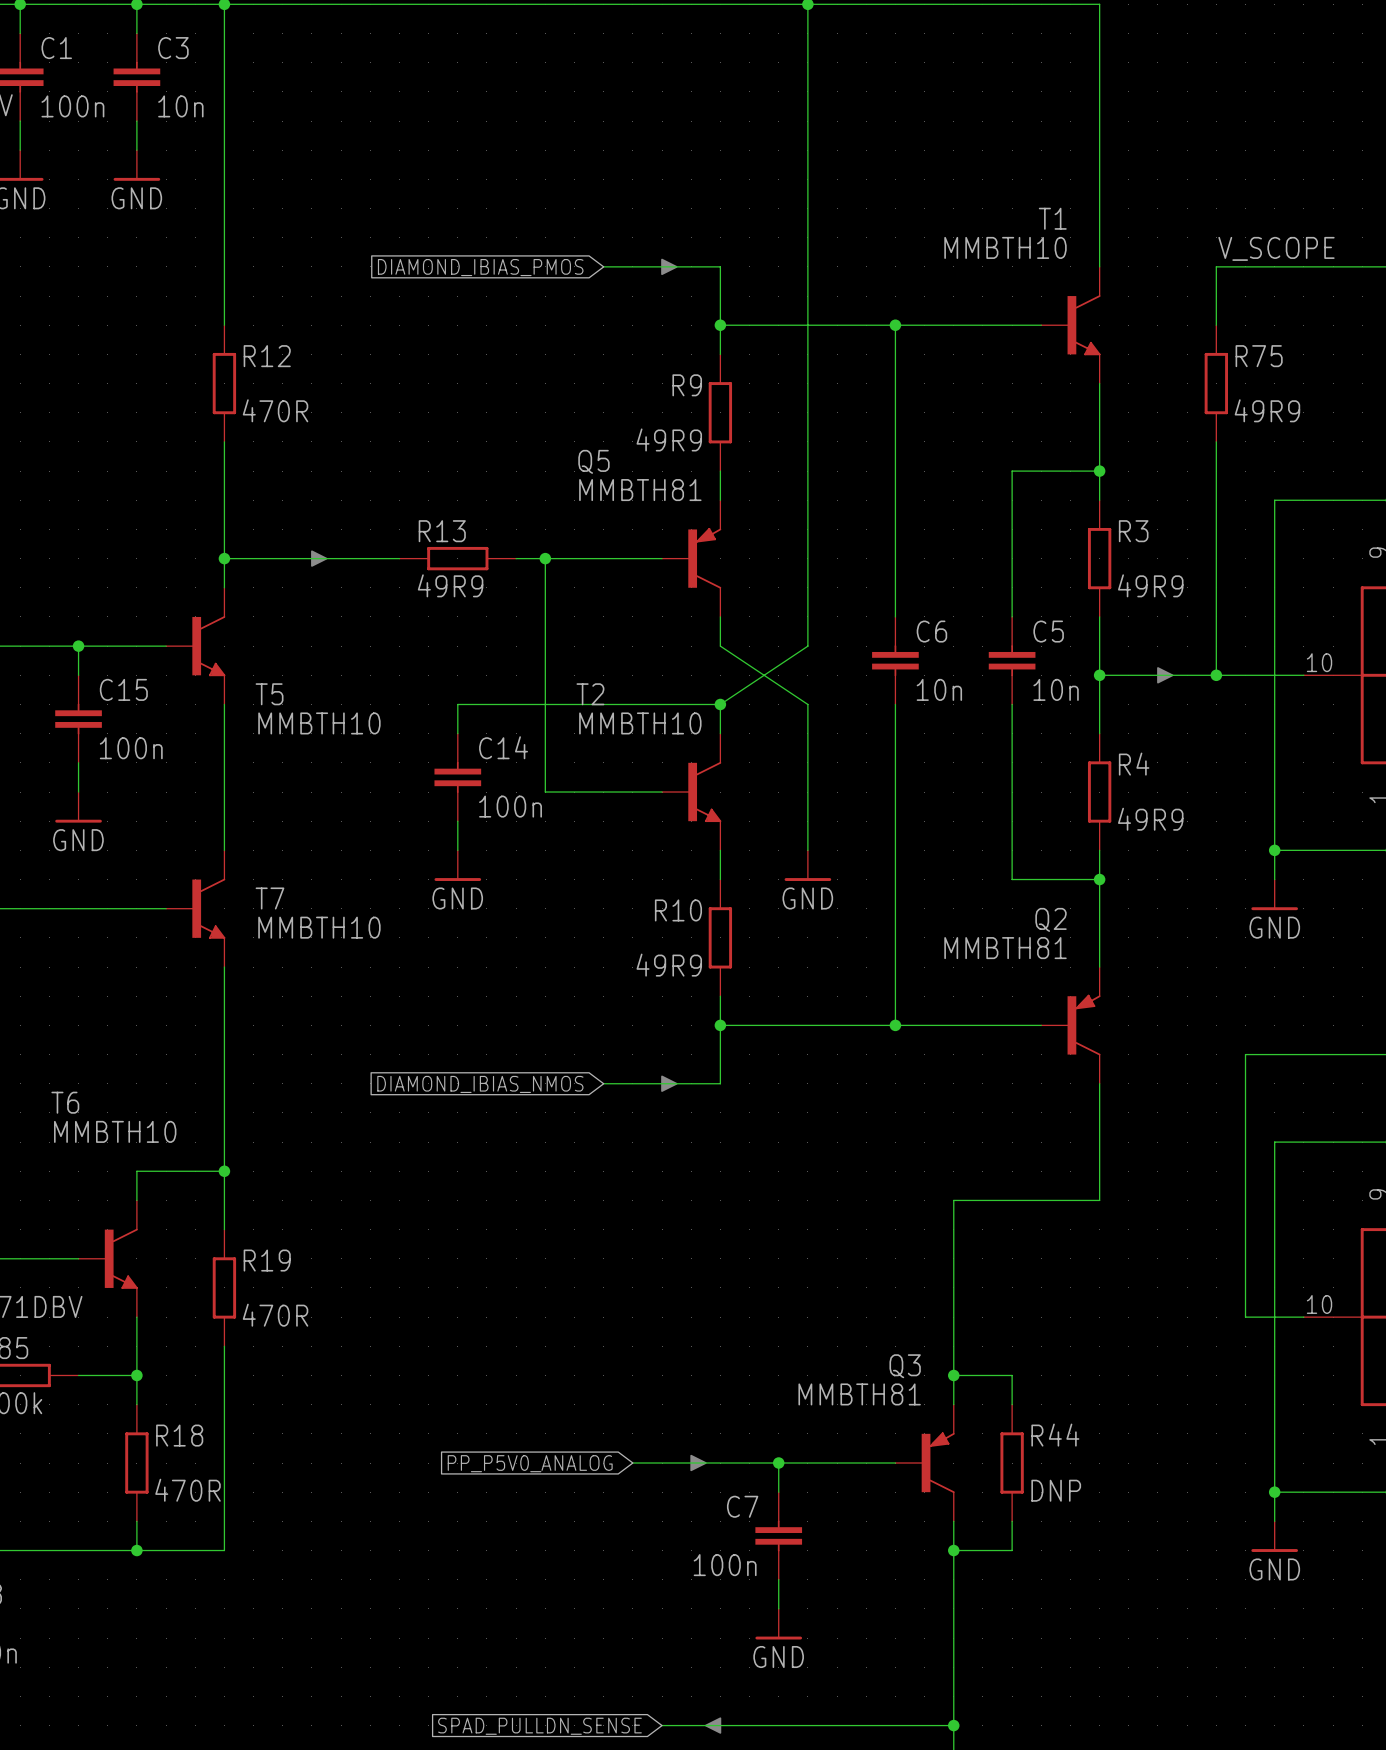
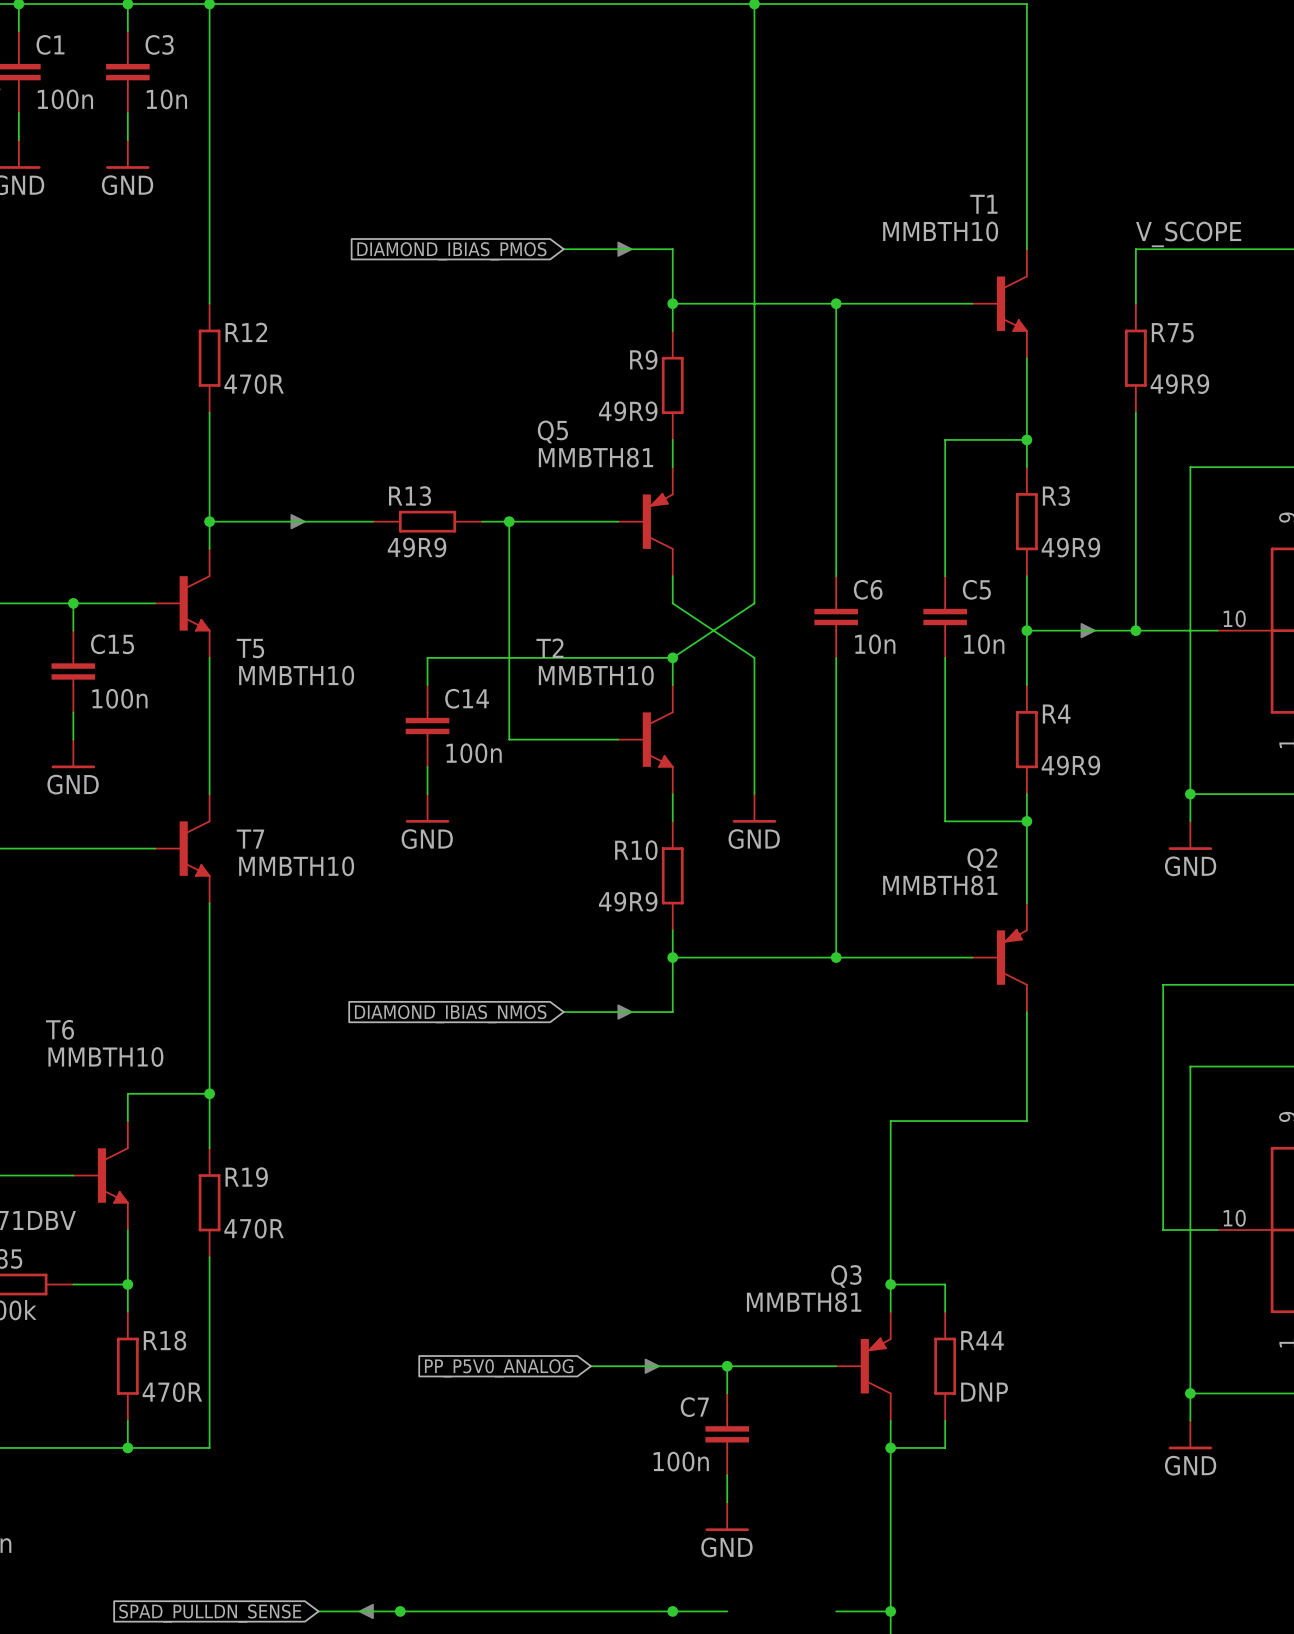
wire: none -> (318, 1611) (618, 1611)
part: none -> (366, 1611)
junction: none -> (400, 1611)
part: (713, 1725) -> none
junction: none -> (672, 1611)
wire: (778, 1725) (895, 1725) -> none
global label: none -> SPAD_PULLDN_SENSE (210, 1613)
global label: SPAD_PULLDN_SENSE (539, 1726) -> none

